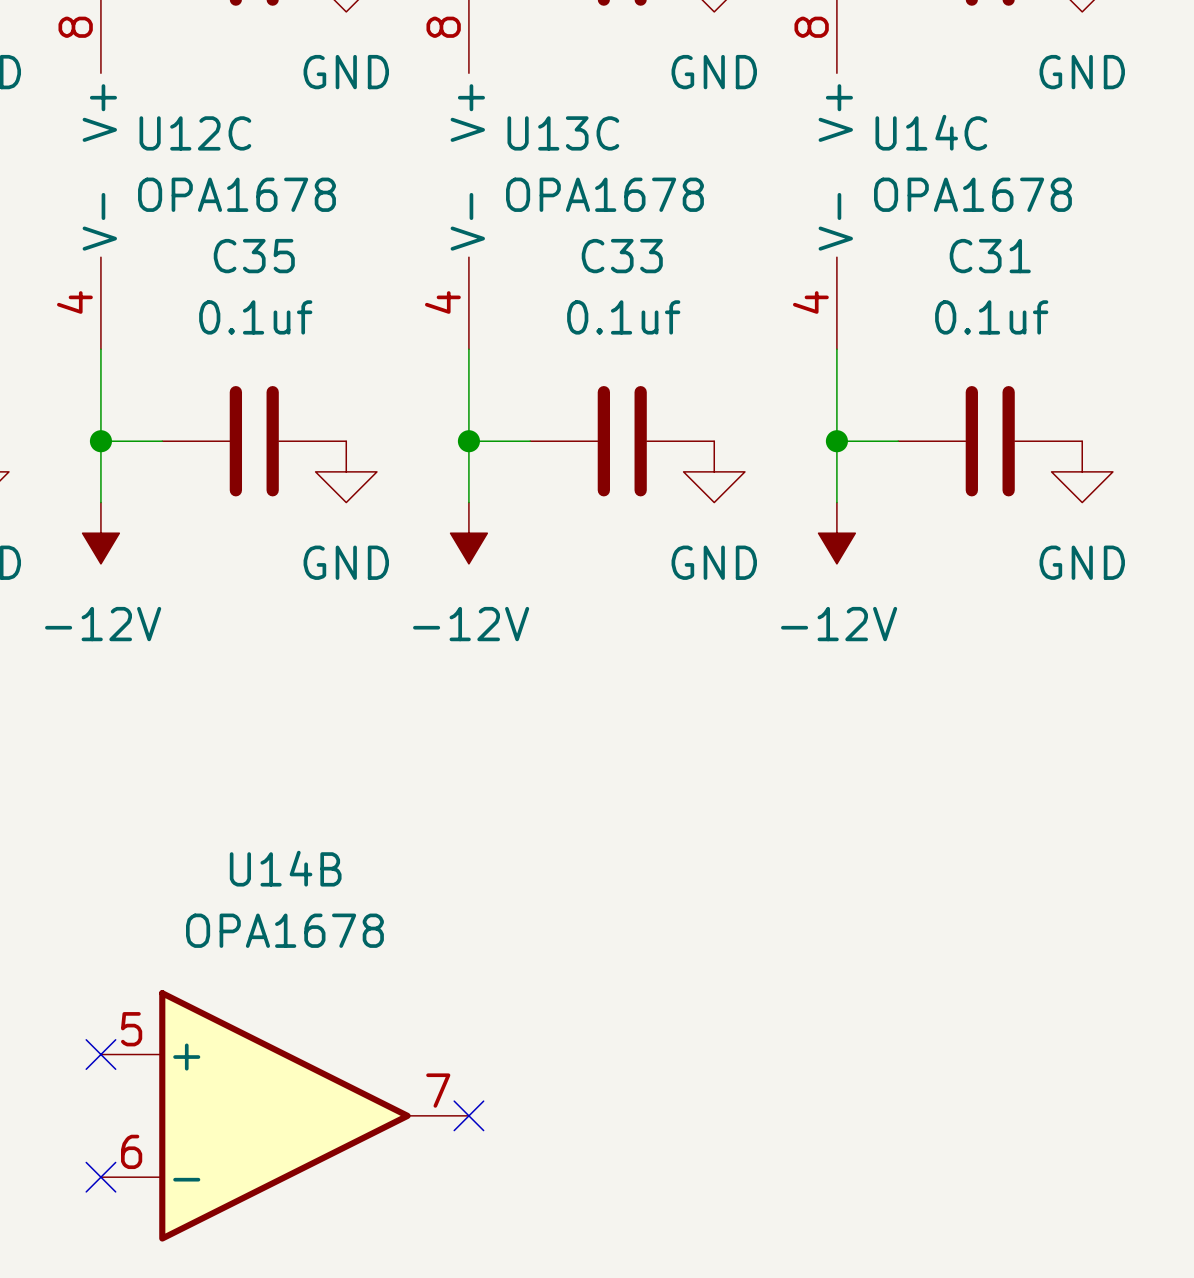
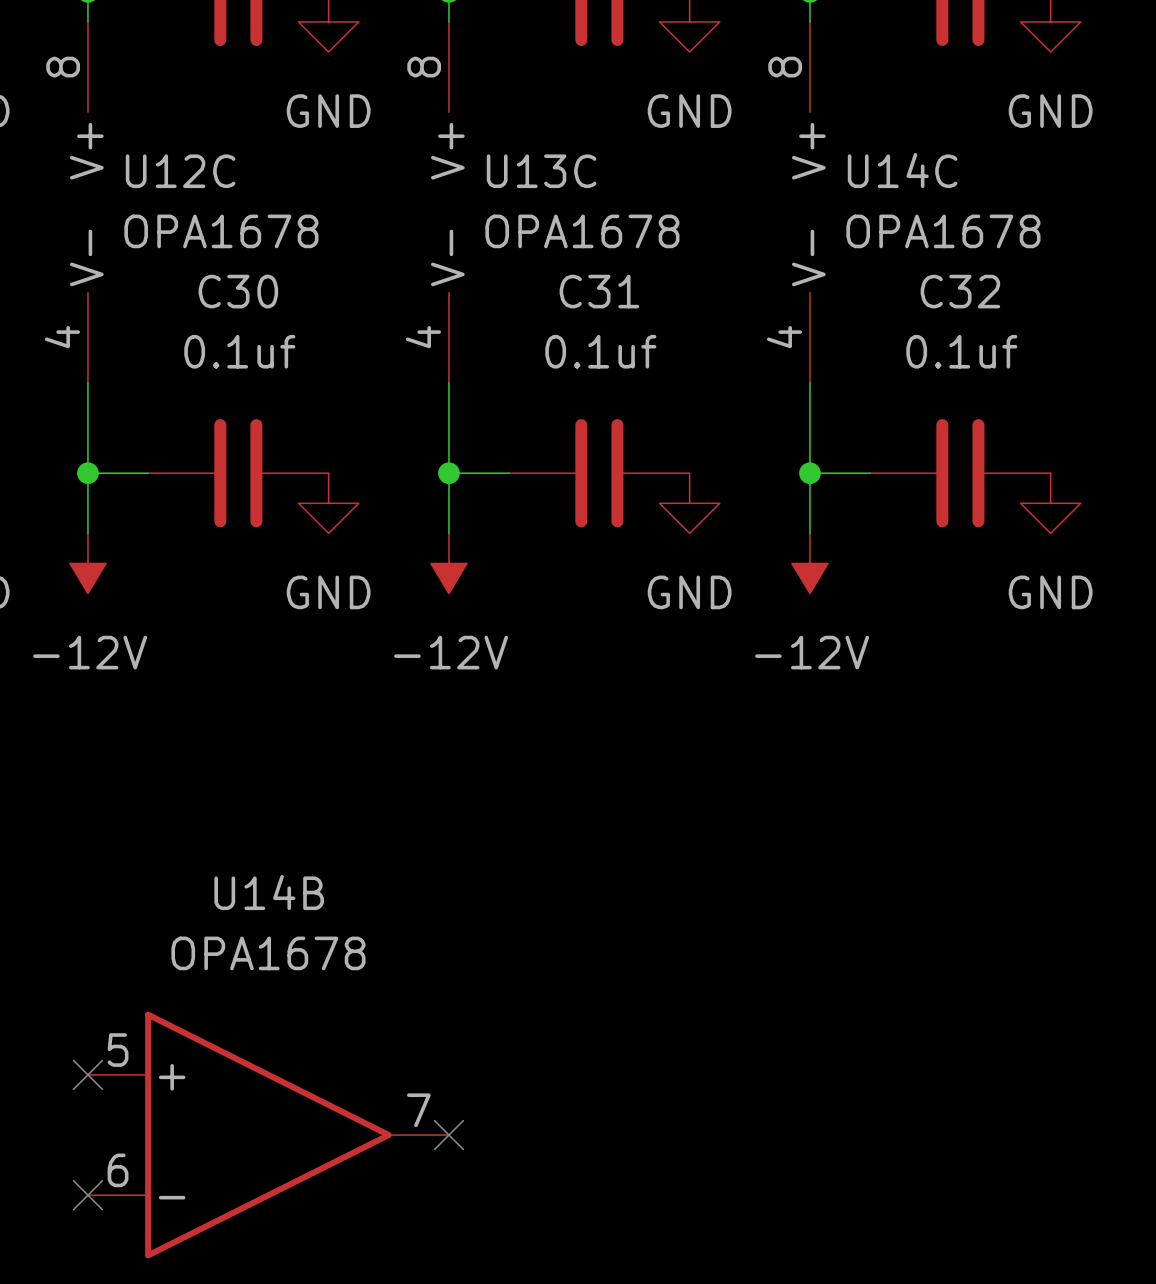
C35 name: C35 (254, 256) -> C30 (238, 291)
C33 name: C33 (622, 256) -> C31 (599, 291)
C31 name: C31 (990, 256) -> C32 (960, 291)

